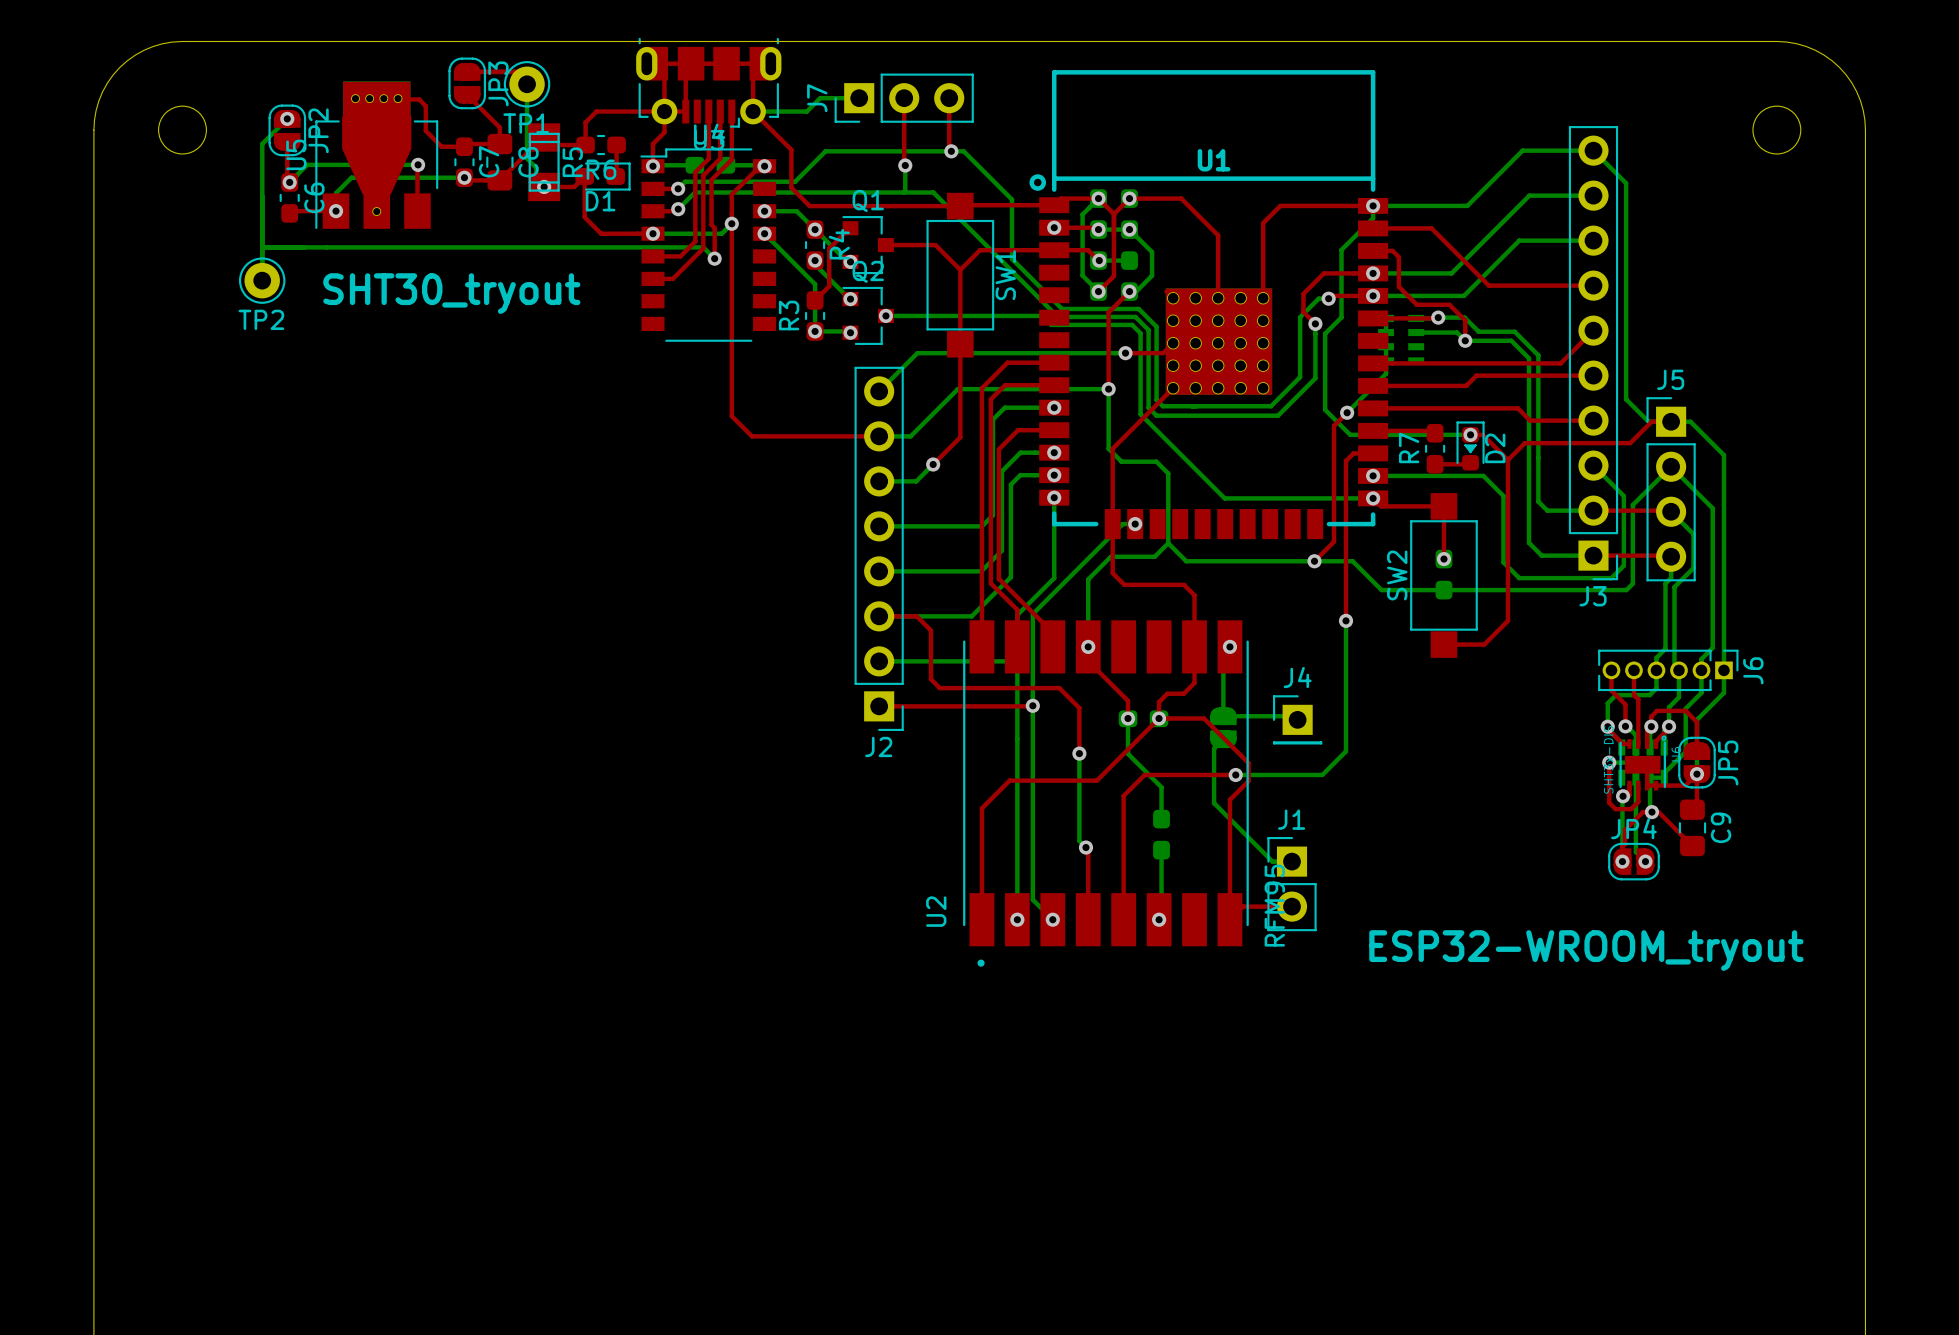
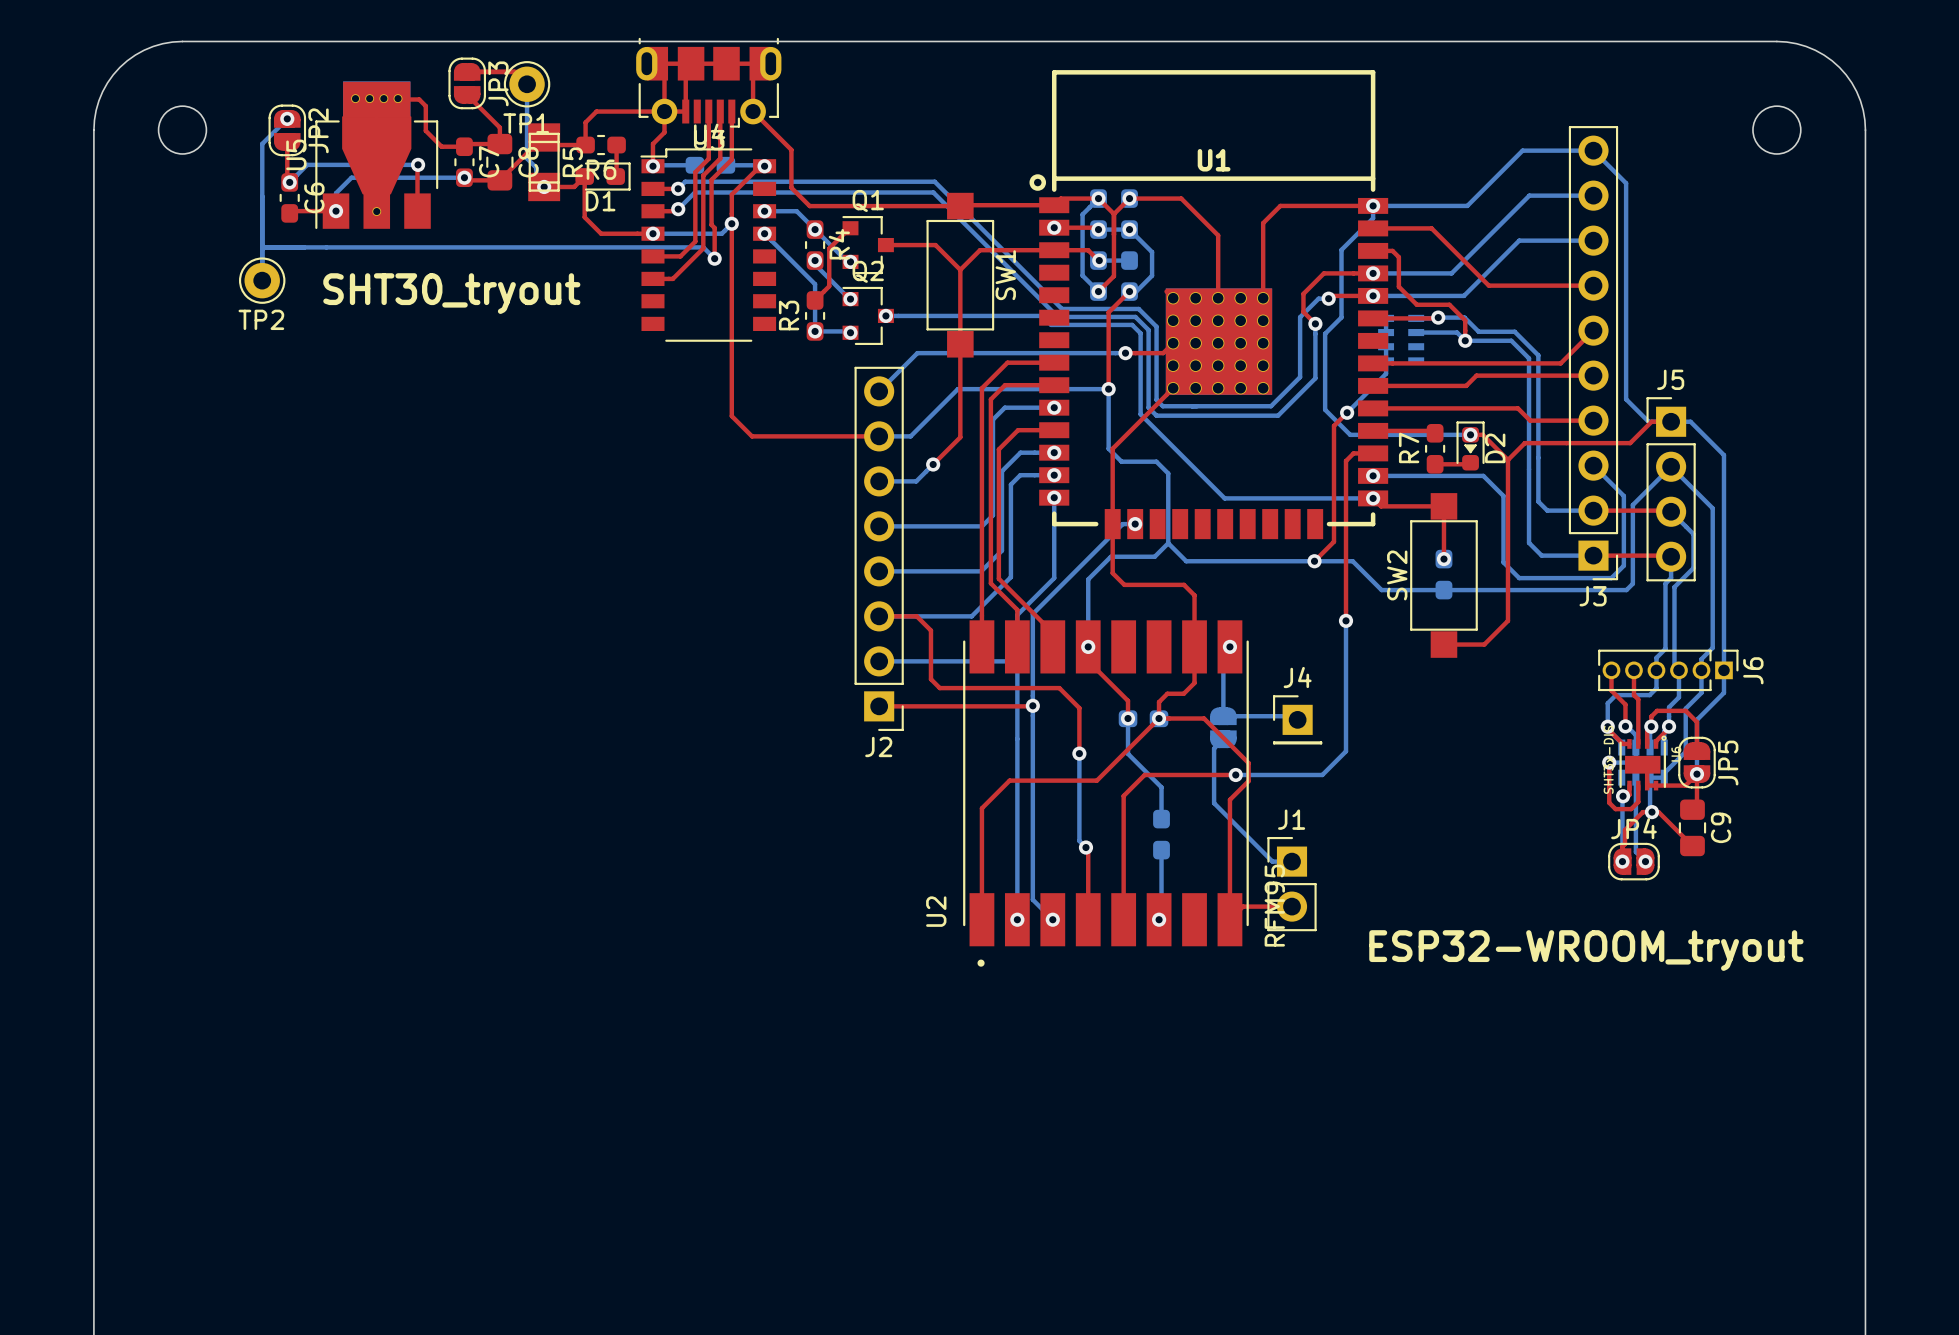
bottom track: (859, 98) (820, 98) (806, 111) (753, 111) -> none
top track: (904, 98) (905, 165) -> none
J7: (904, 98) -> none
top track: (949, 98) (949, 149) (951, 151) -> none
via: (951, 151) -> none
bottom track: (905, 165) (903, 192) -> none
via: (905, 165) -> none
bottom track: (795, 181) (825, 151) (963, 151) (1012, 199) (1012, 258) -> (795, 181) (934, 181) (1012, 258)

